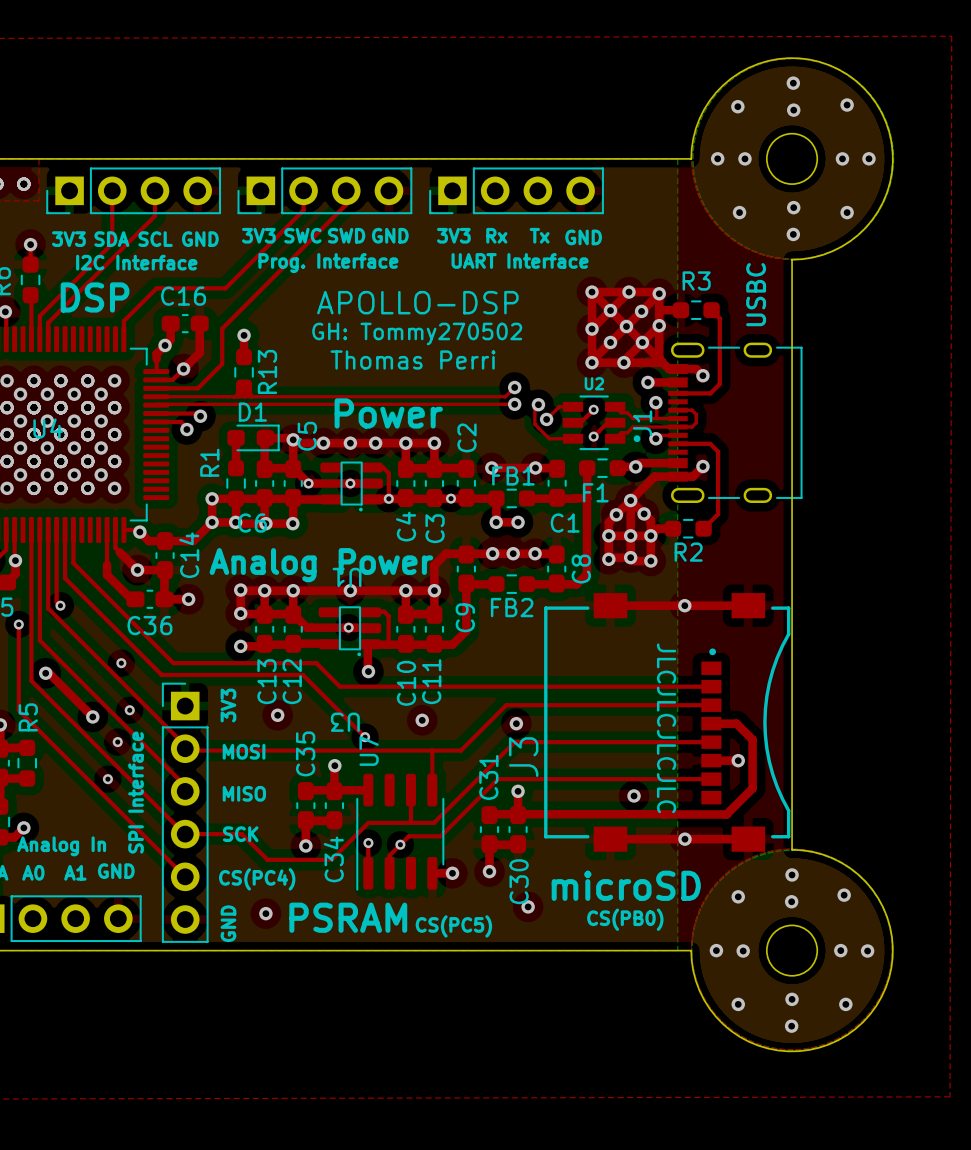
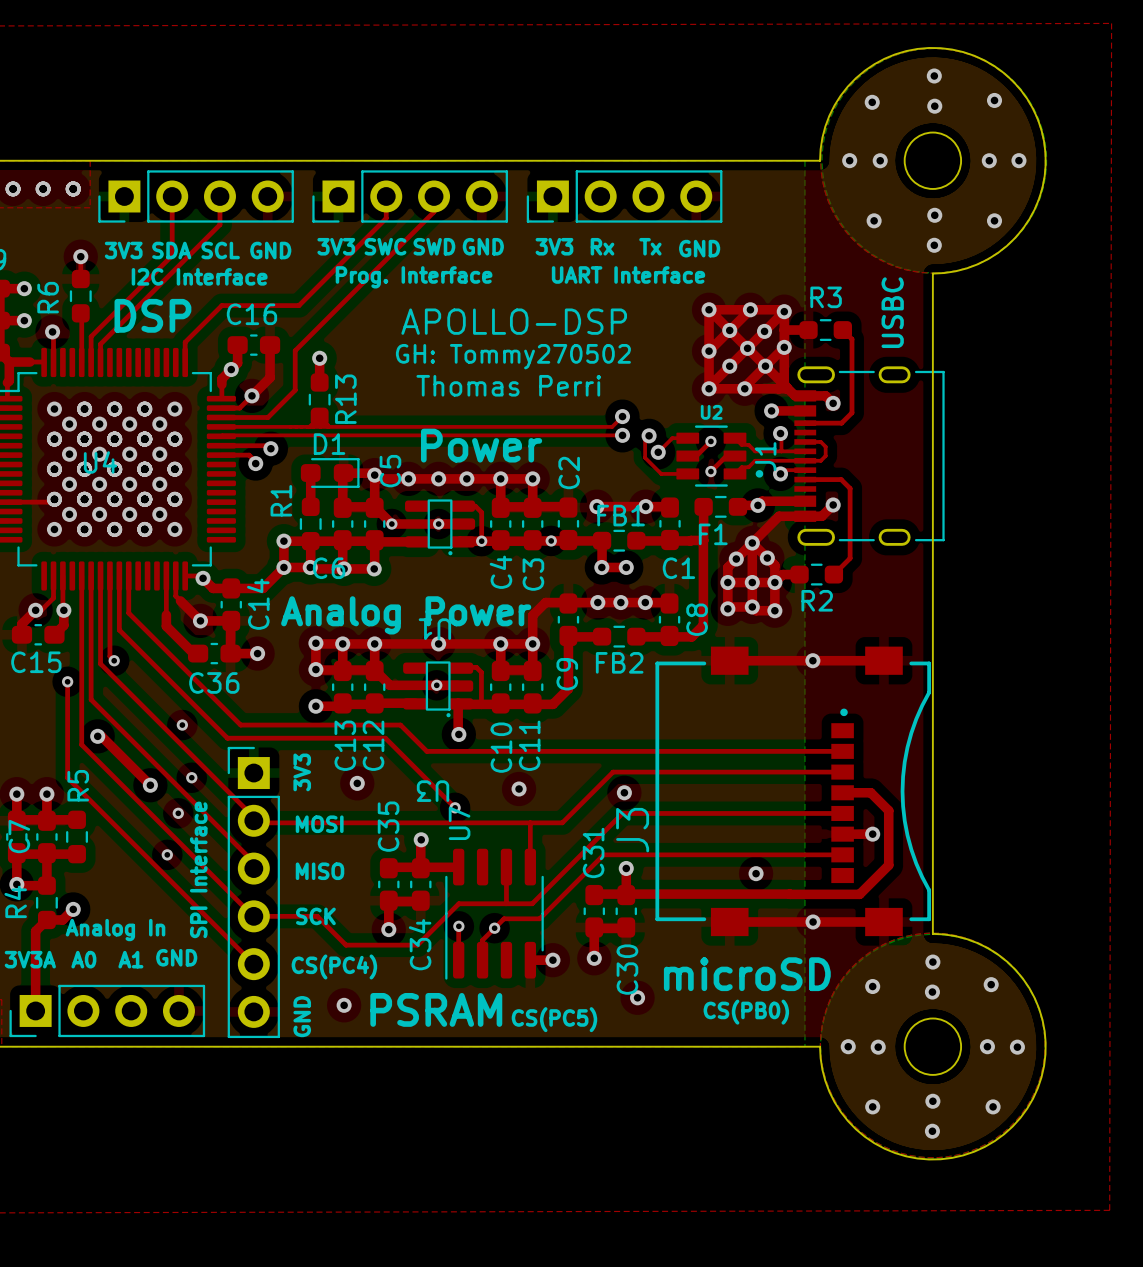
text: JLCJLCJLCJLC (666, 728) -> none

